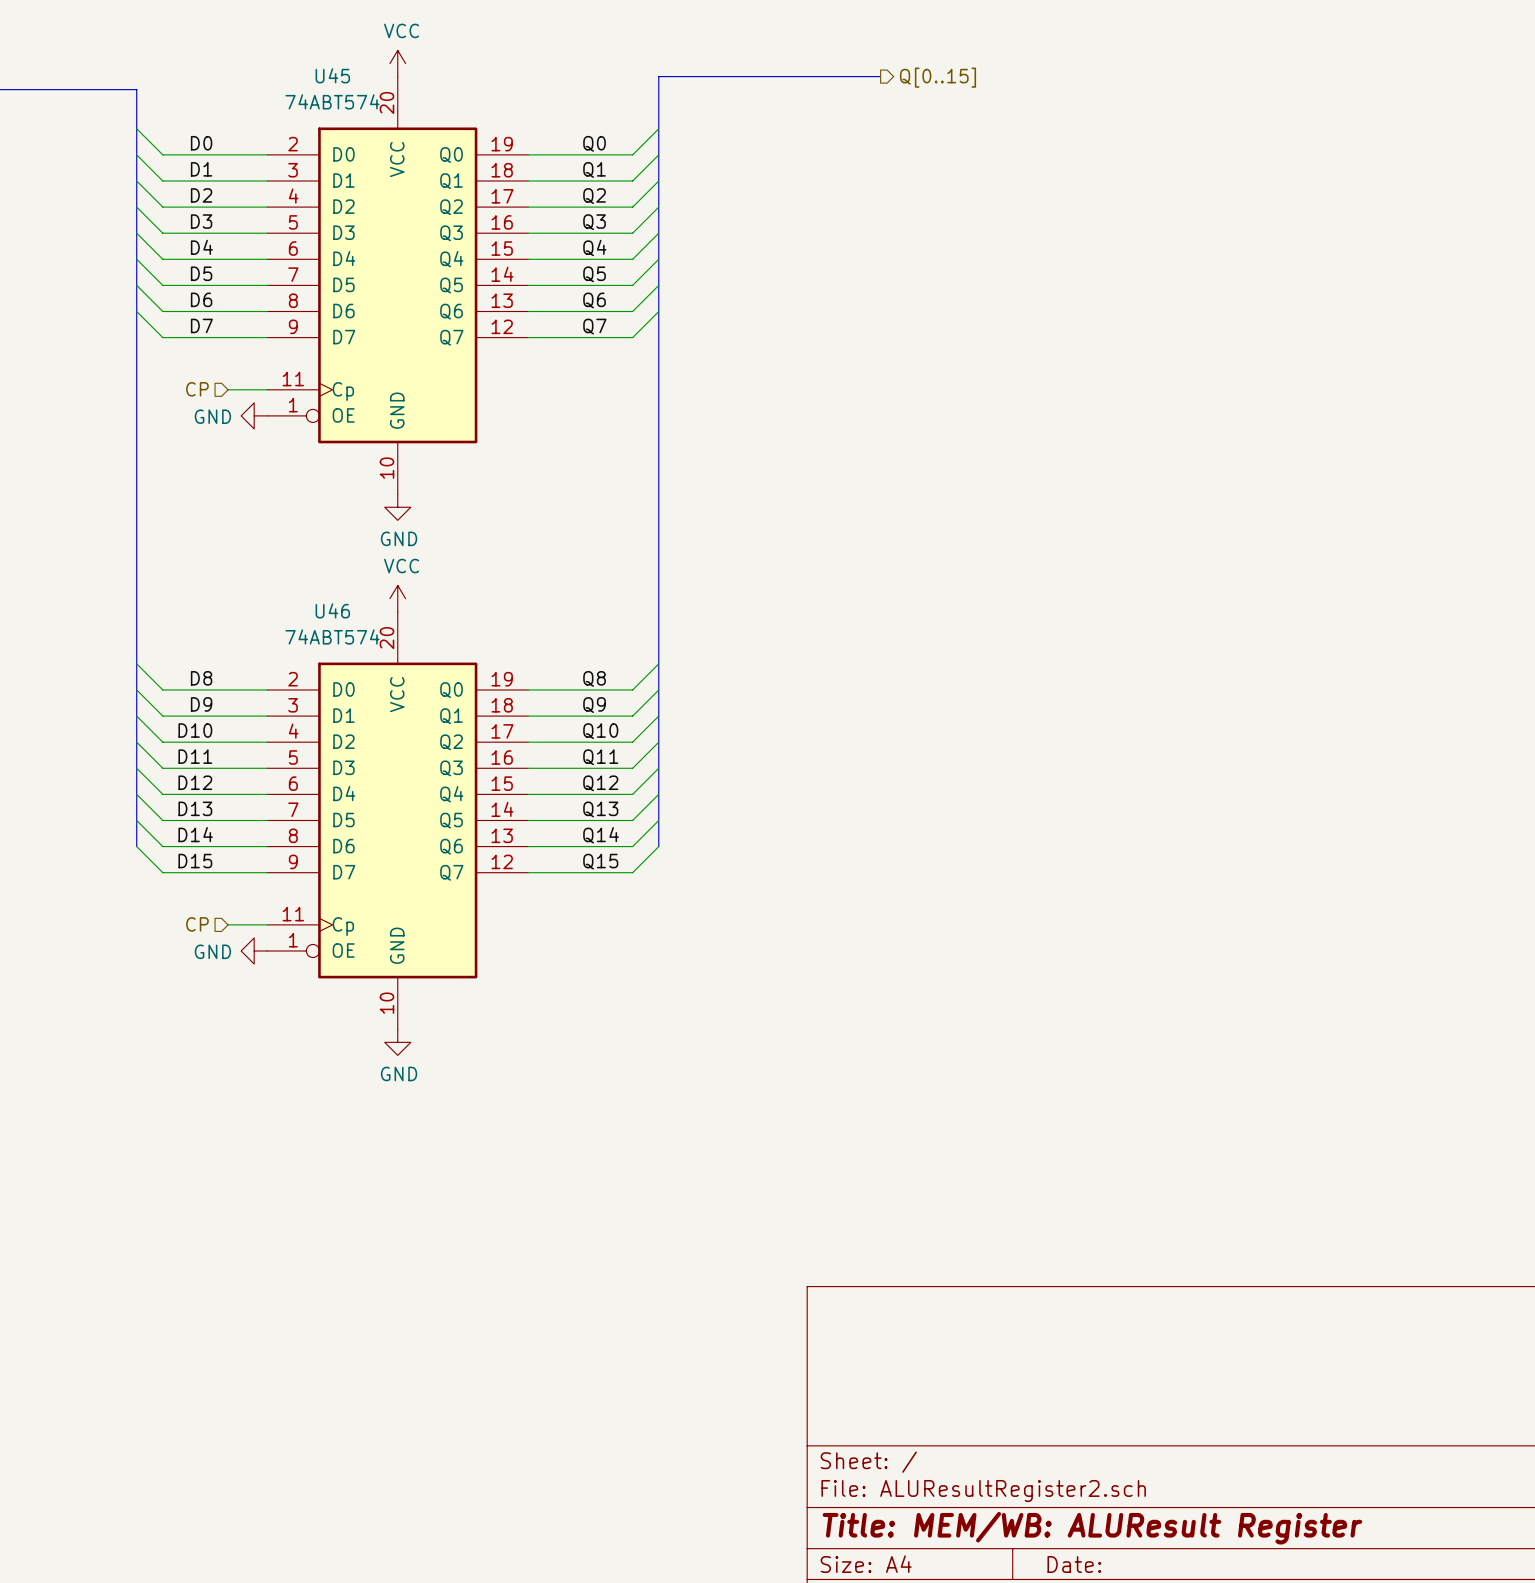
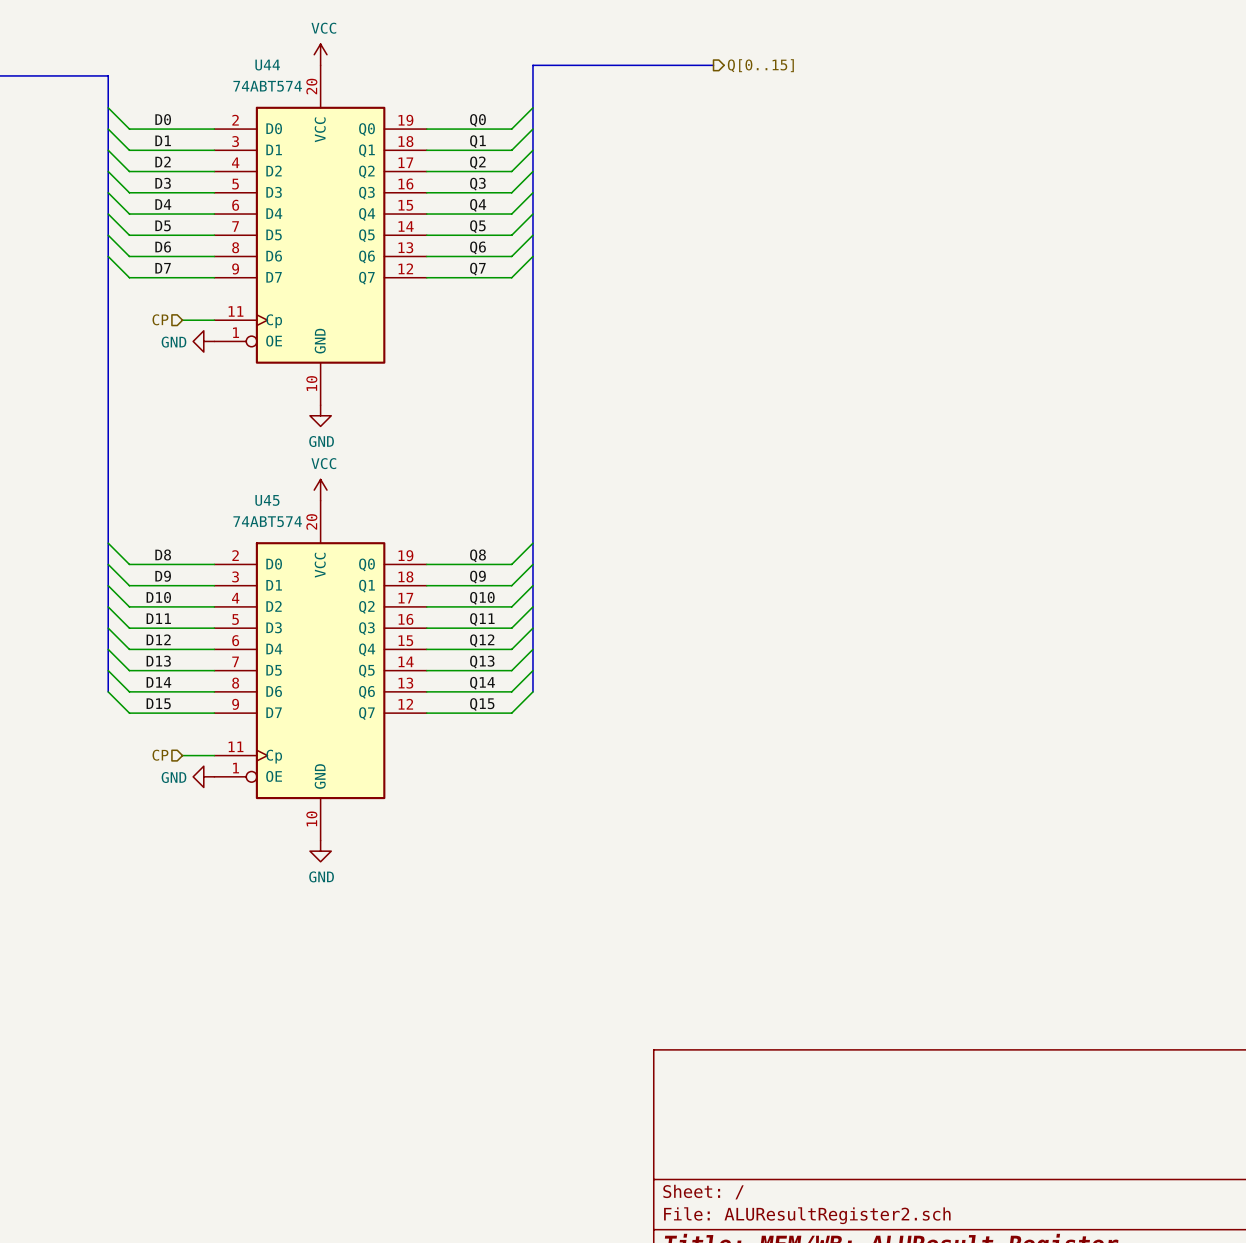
U45 name: U45 (332, 75) -> U44 (267, 65)
U46 name: U46 (332, 610) -> U45 (267, 500)

